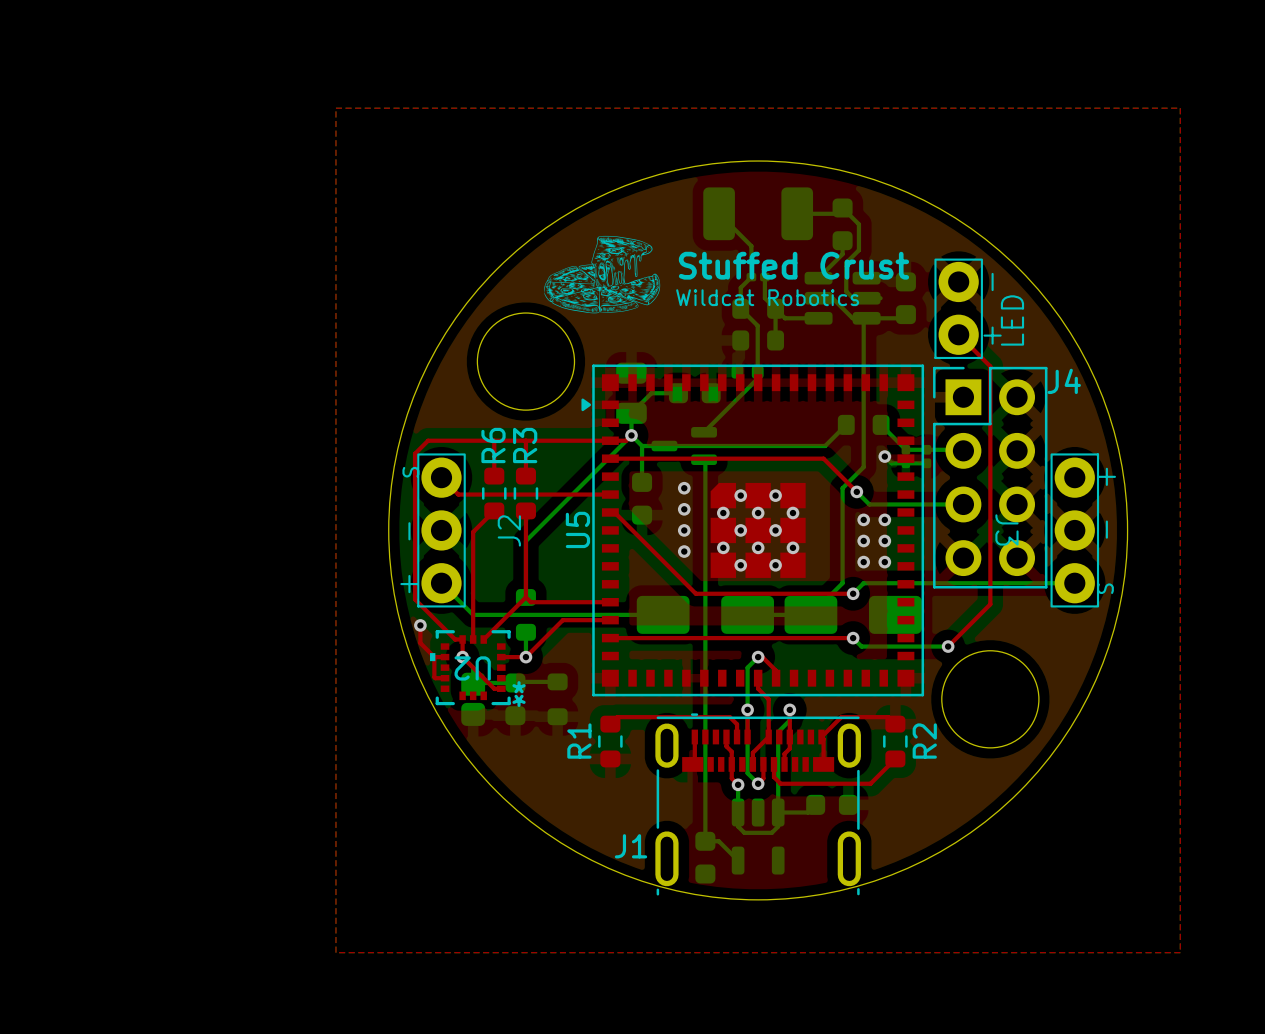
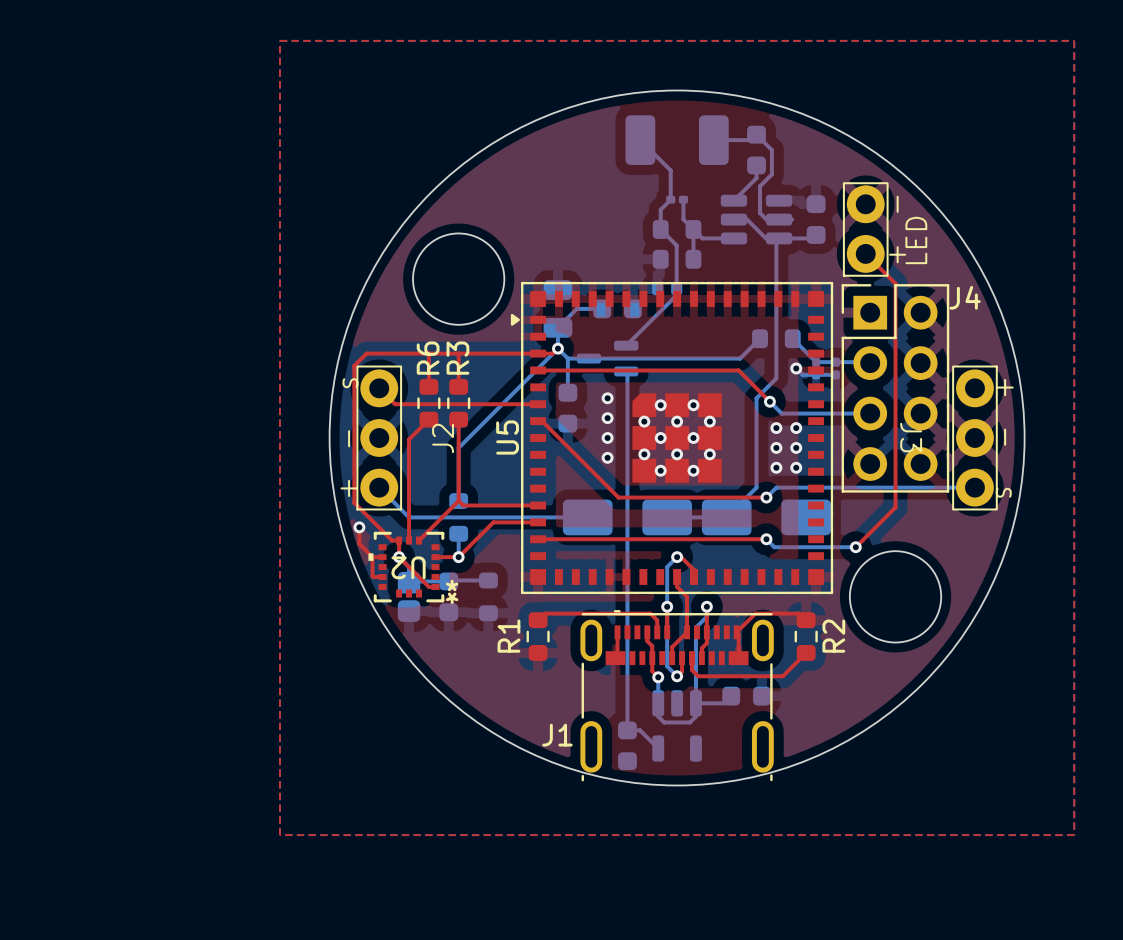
drawing: [544, 235, 661, 314] -> none
text: Stuffed Crust (793, 265) -> none
text: Wildcat Robotics (767, 297) -> none

